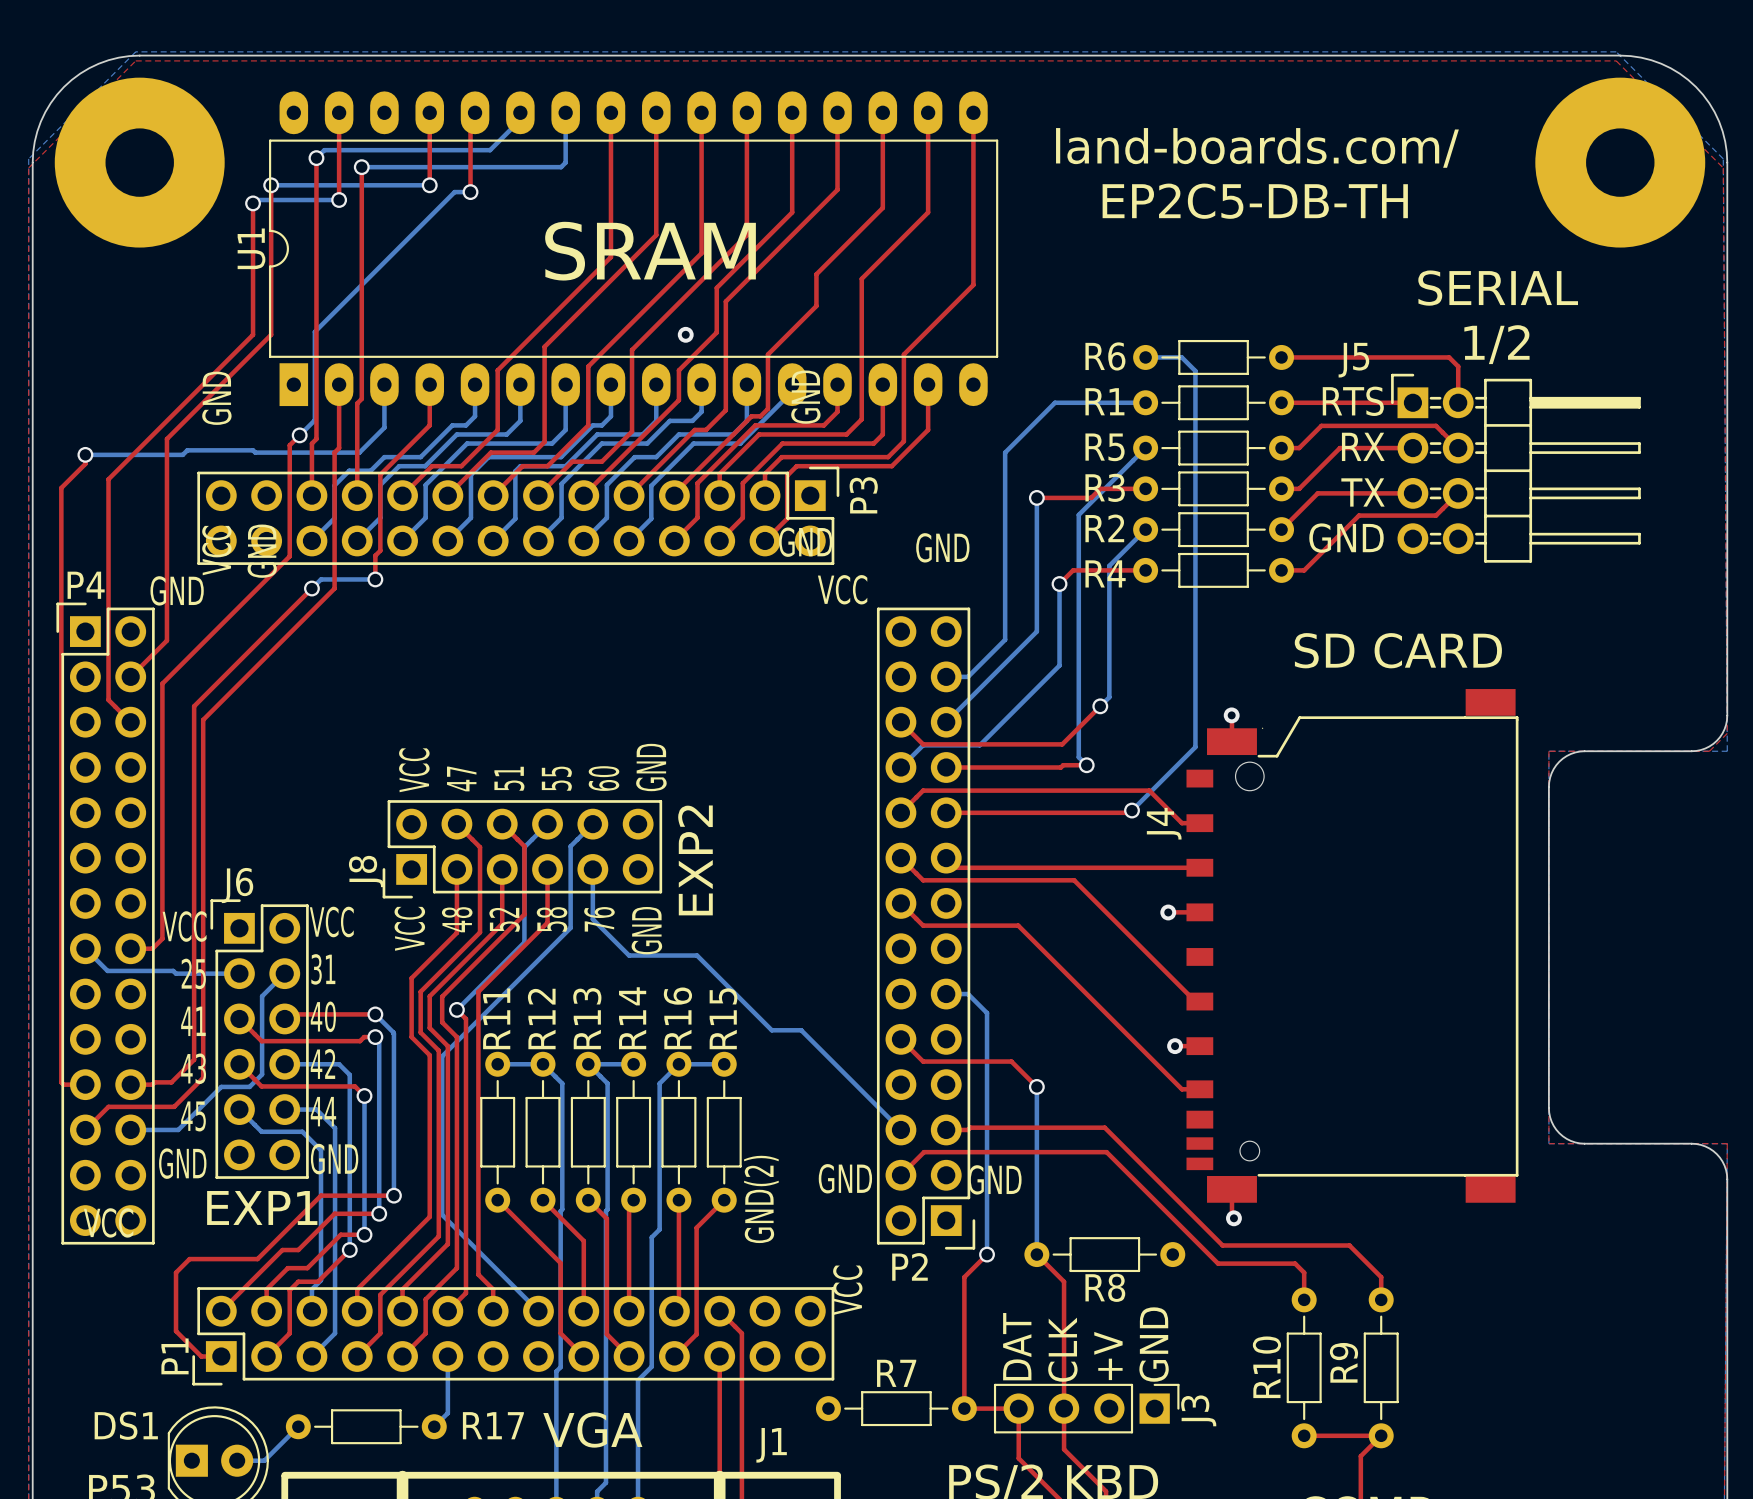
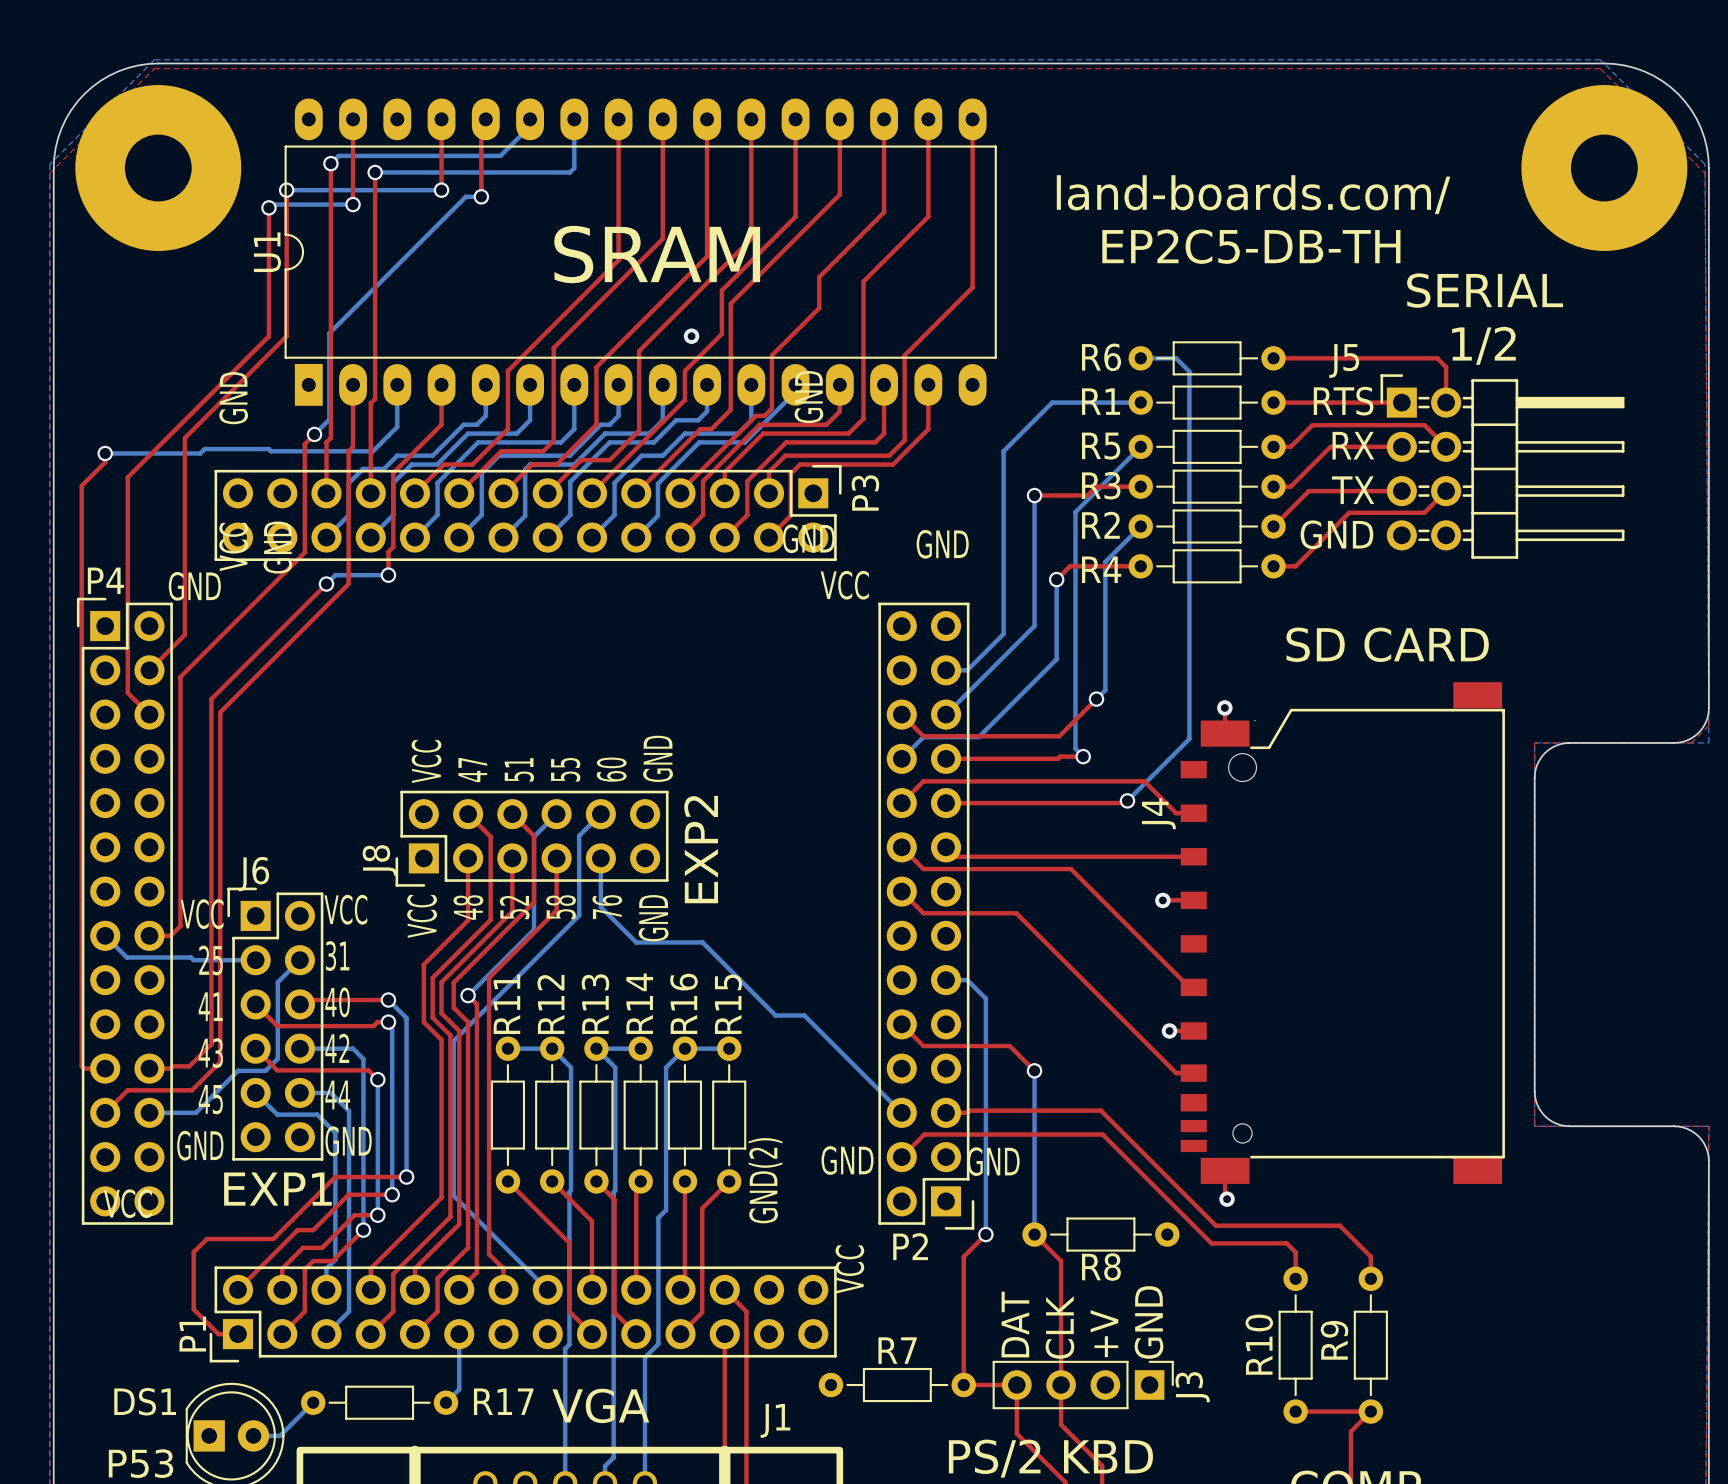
text position: land-boards.com/ (1257, 147) -> land-boards.com/ (1253, 194)
text position: EP2C5-DB-TH (1255, 201) -> EP2C5-DB-TH (1251, 246)

